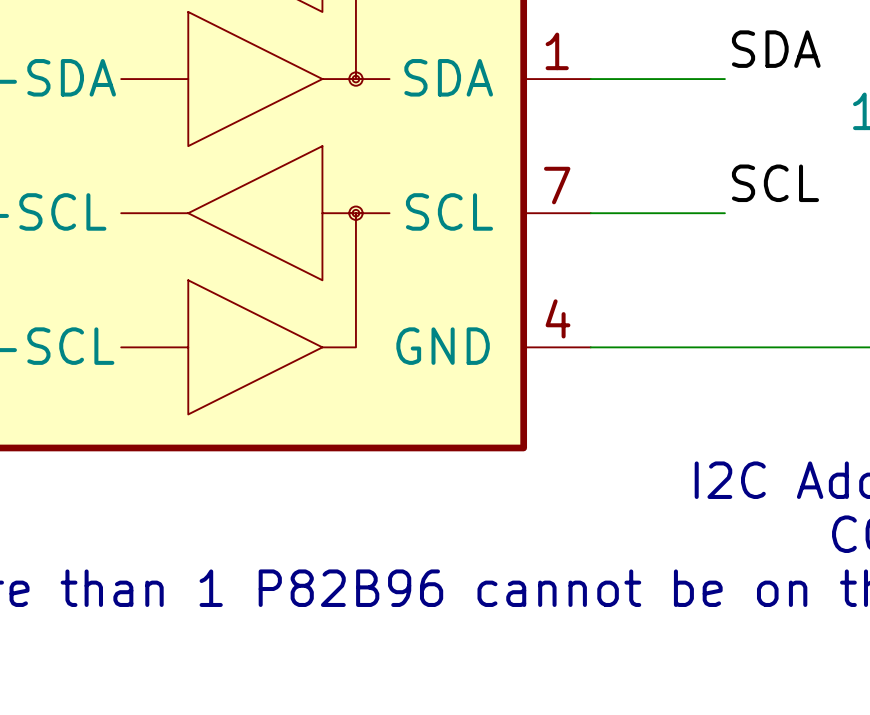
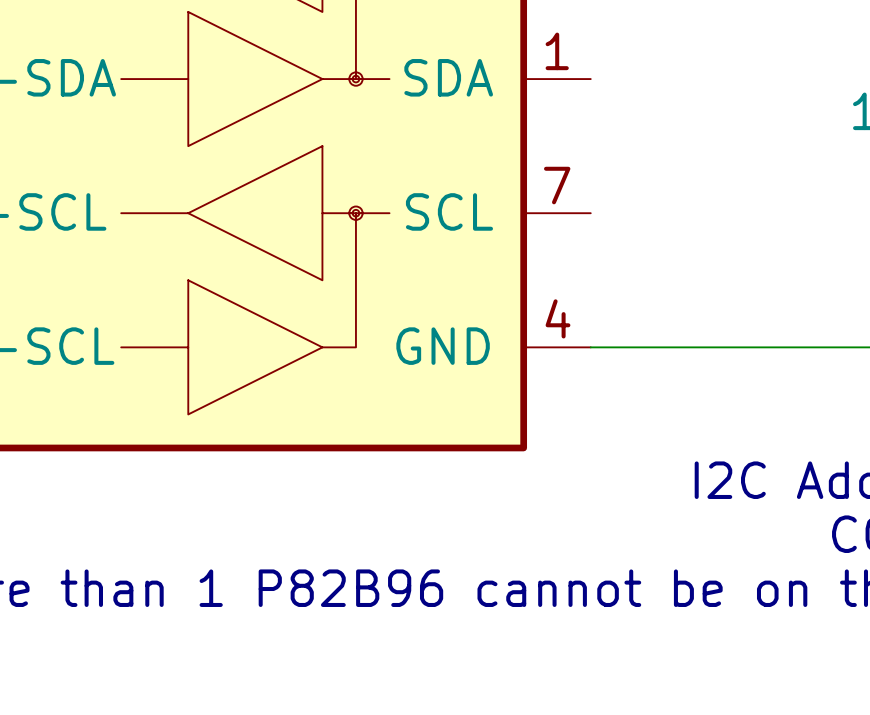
label: SDA (776, 49) -> none
wire: (590, 79) (724, 79) -> none
label: SCL (775, 183) -> none
wire: (590, 213) (724, 213) -> none

